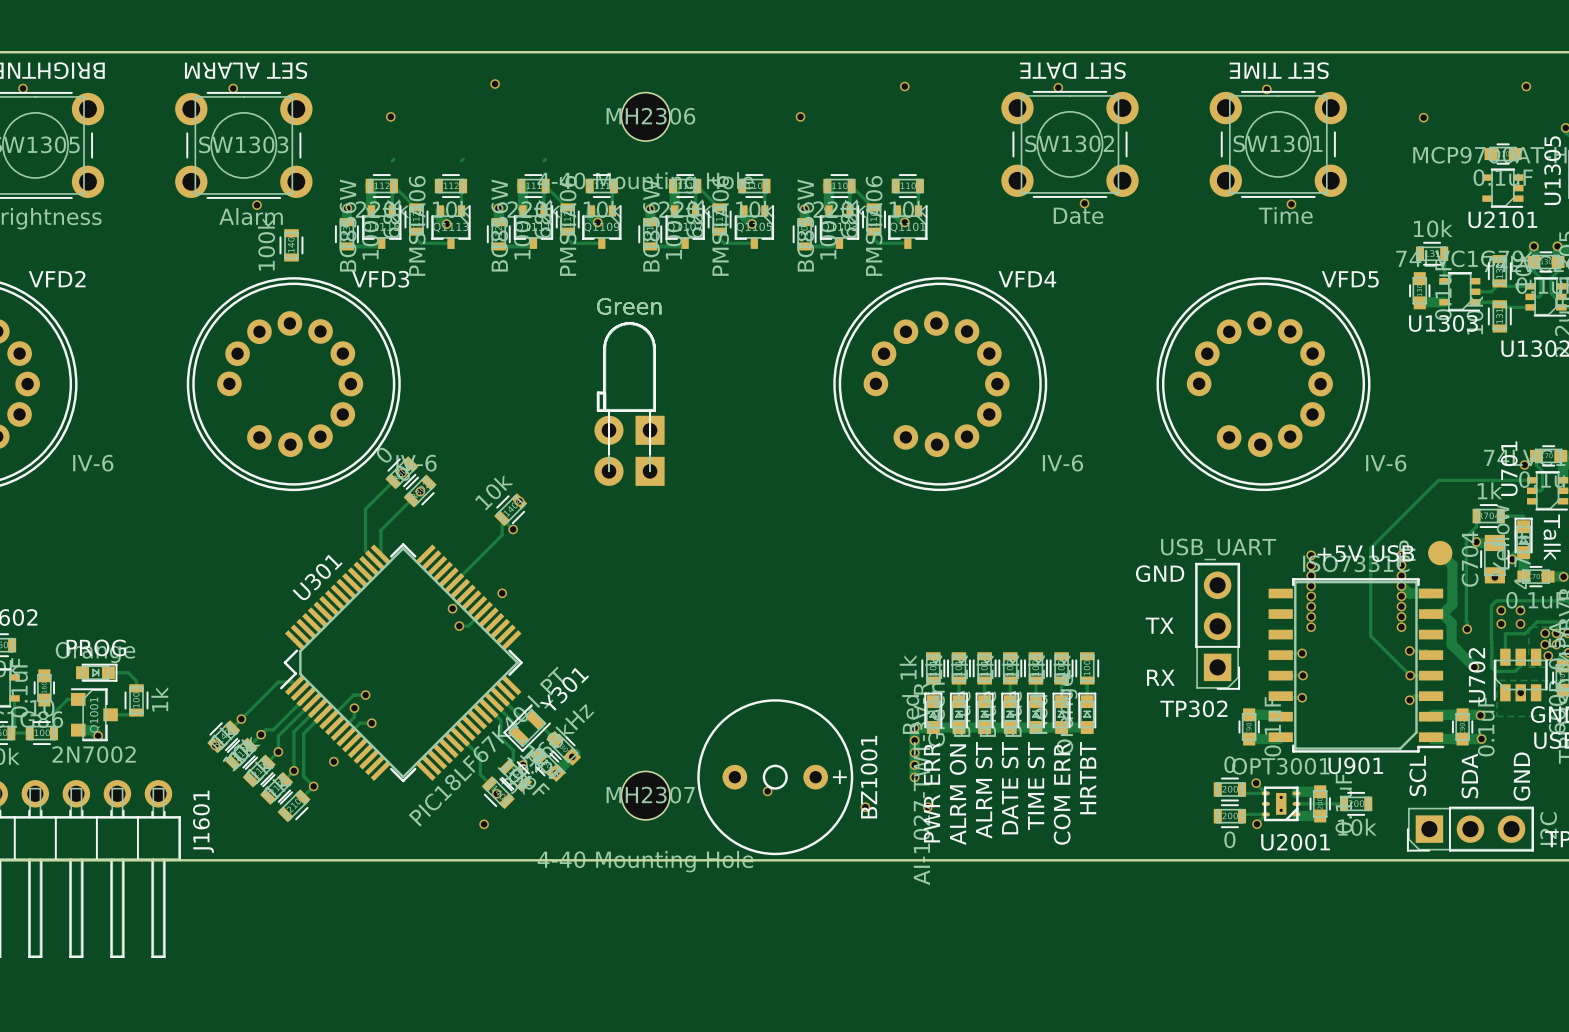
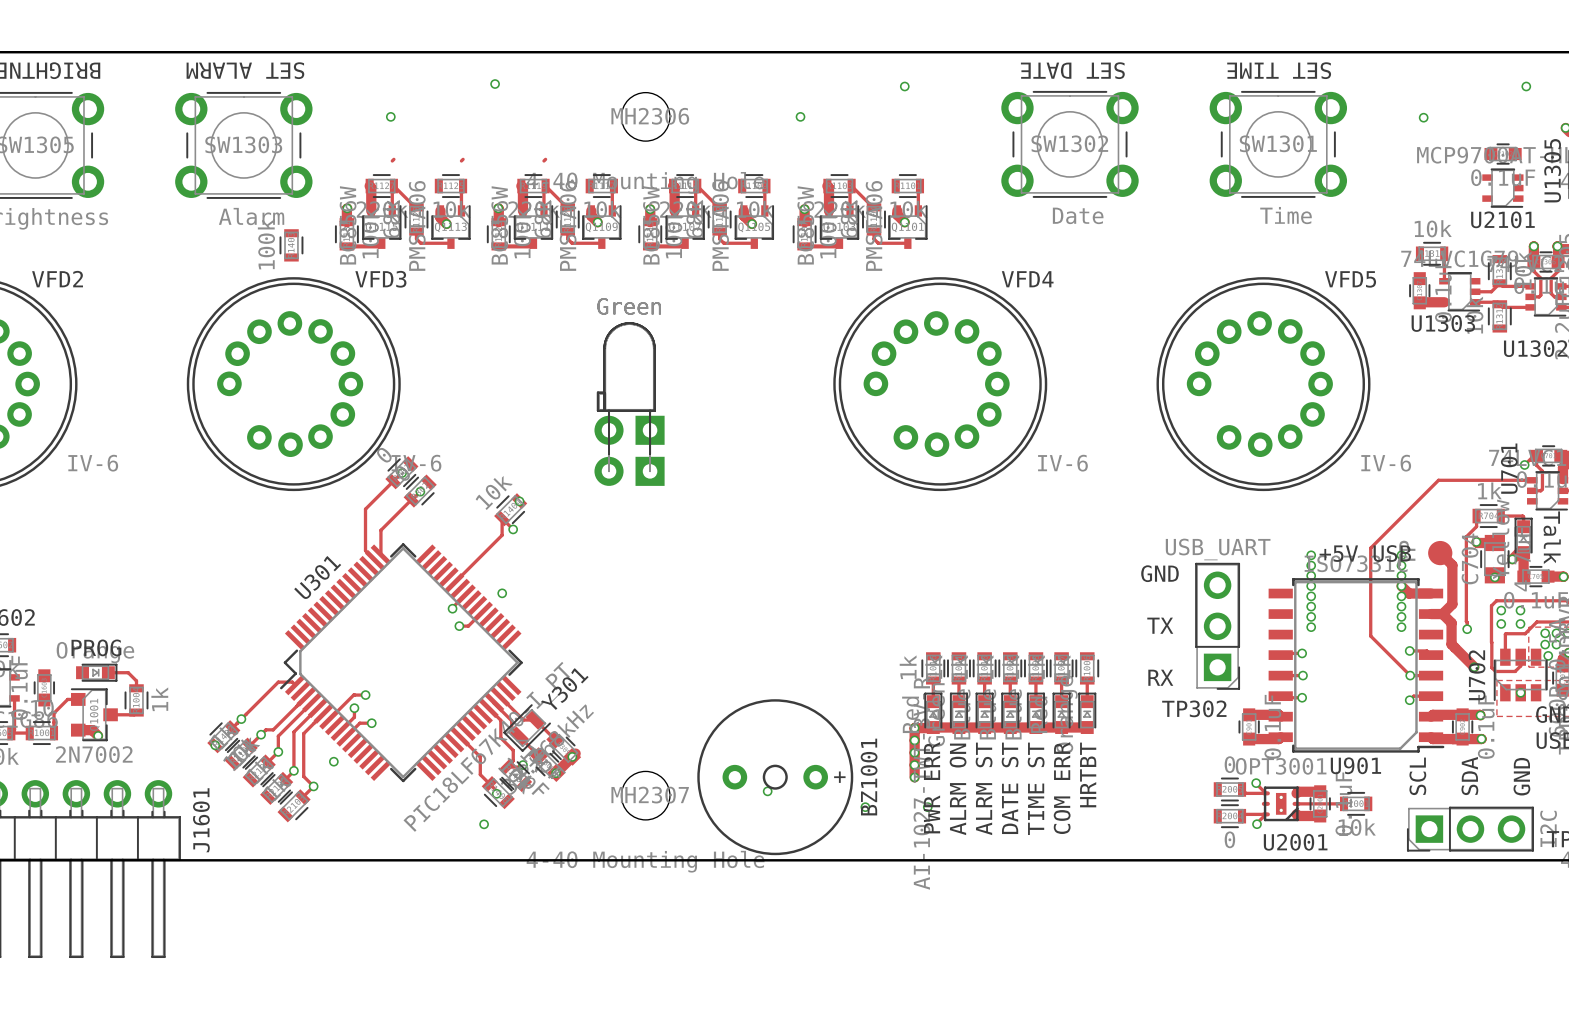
via: (1058, 87) -> none
via: (23, 88) -> none
via: (233, 88) -> none
via: (1266, 89) -> none
via: (1084, 203) -> none
via: (1291, 204) -> none
via: (256, 205) -> none

